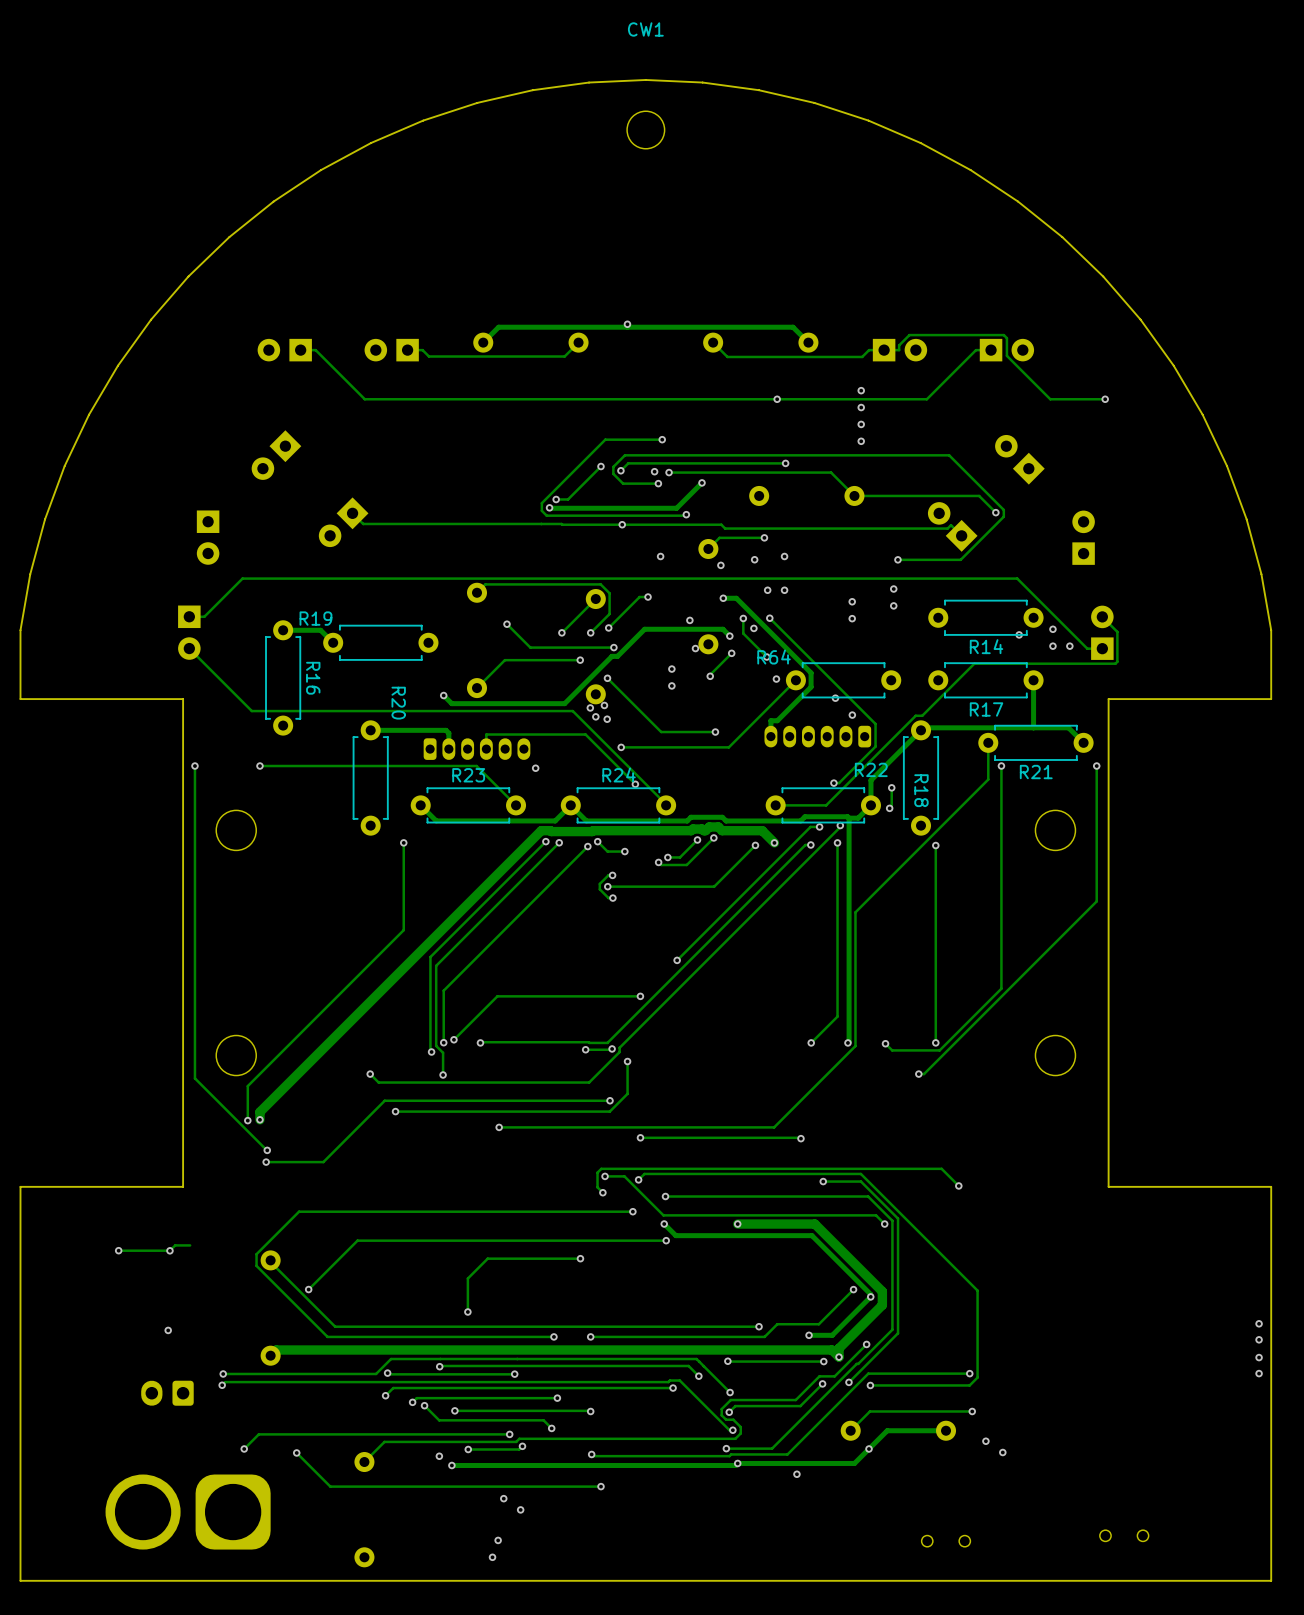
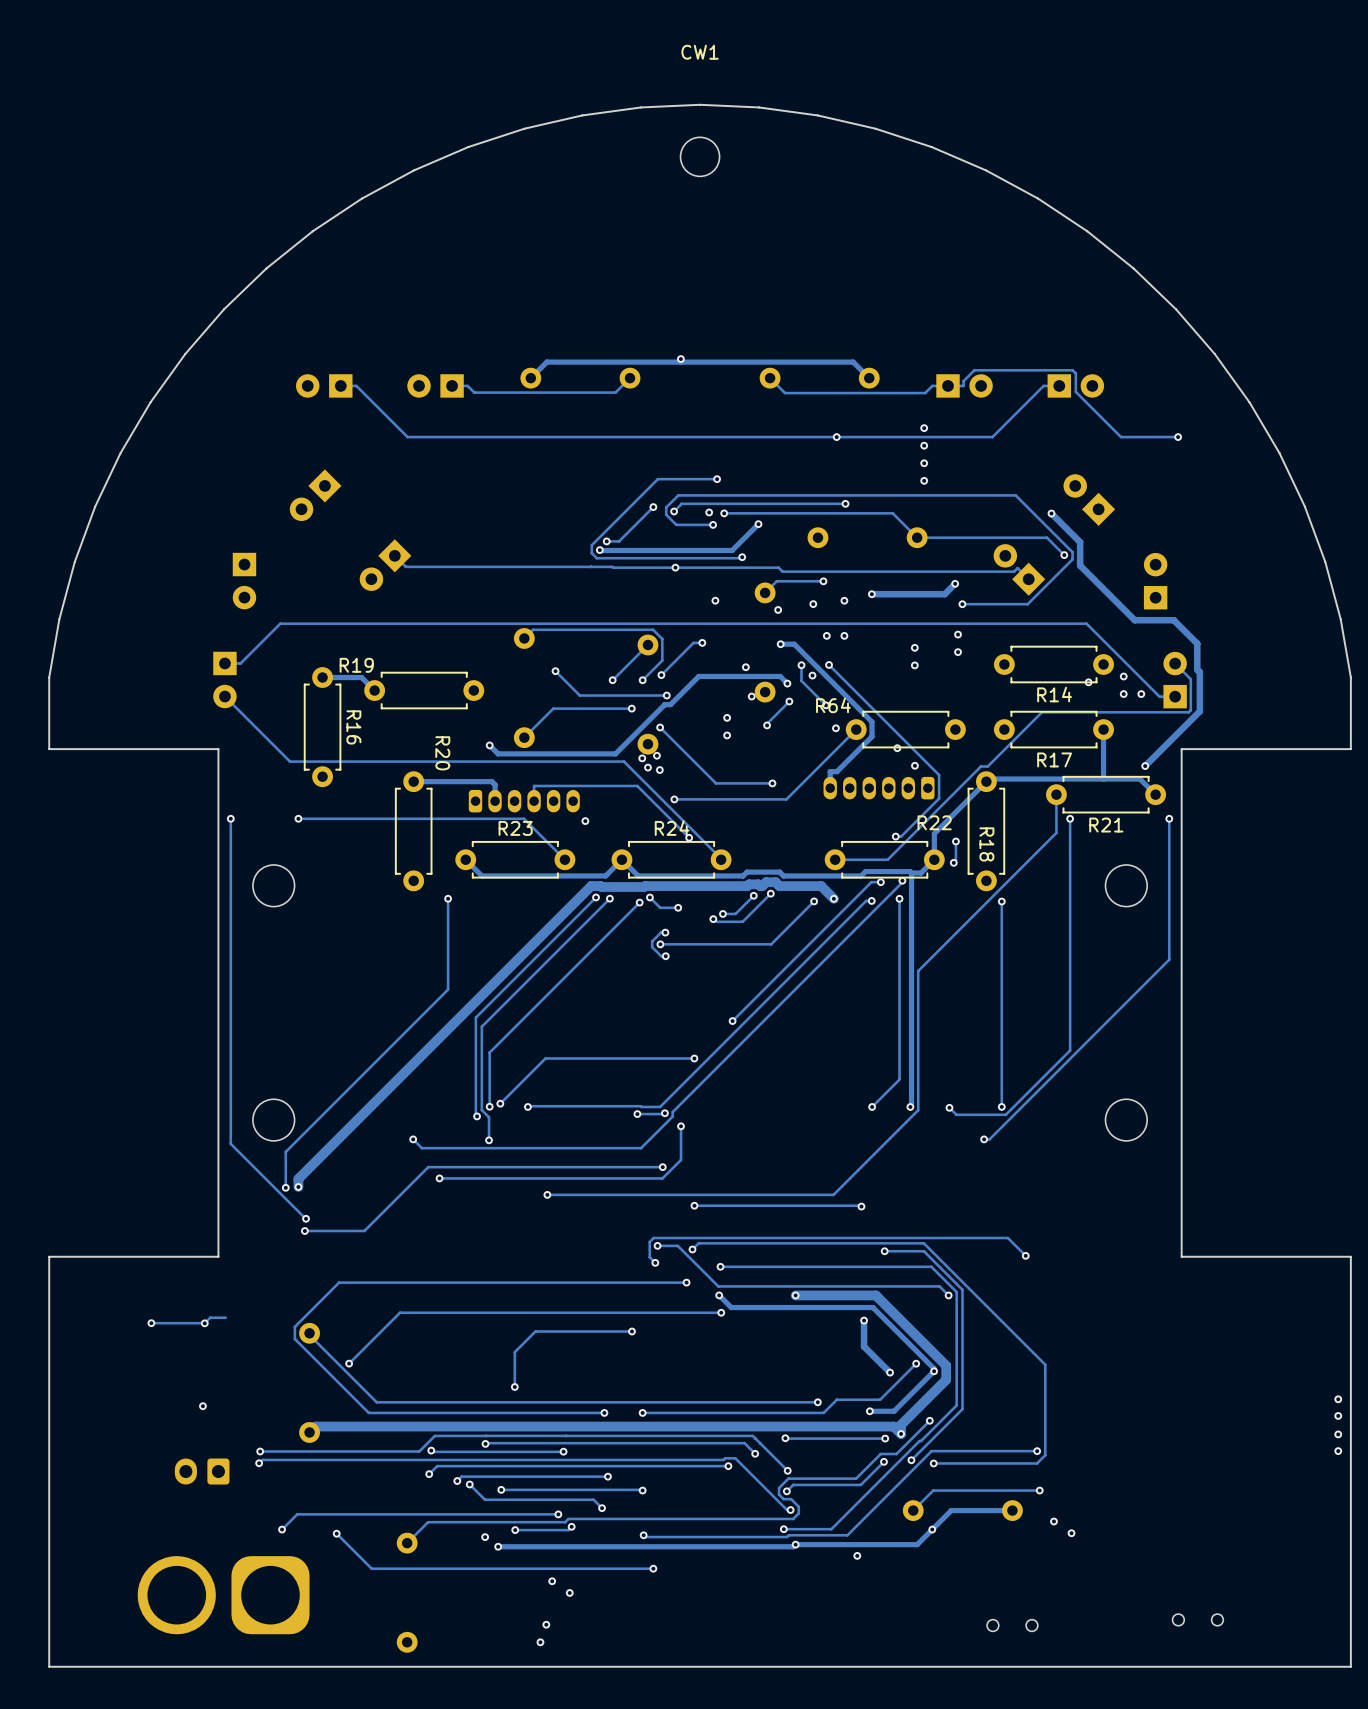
track: none -> (1051, 513) (1080, 542) (1080, 565) (1134, 620) (1173, 620) (1197, 643) (1197, 669) (1199, 672) (1199, 711) (1145, 766)
via: none -> (1051, 513)
track: none -> (955, 583) (944, 594) (871, 594)
via: none -> (955, 583)
via: none -> (871, 594)
via: none -> (1145, 766)
track: none -> (864, 1320) (864, 1346) (890, 1372)
via: none -> (864, 1320)
via: none -> (890, 1372)

